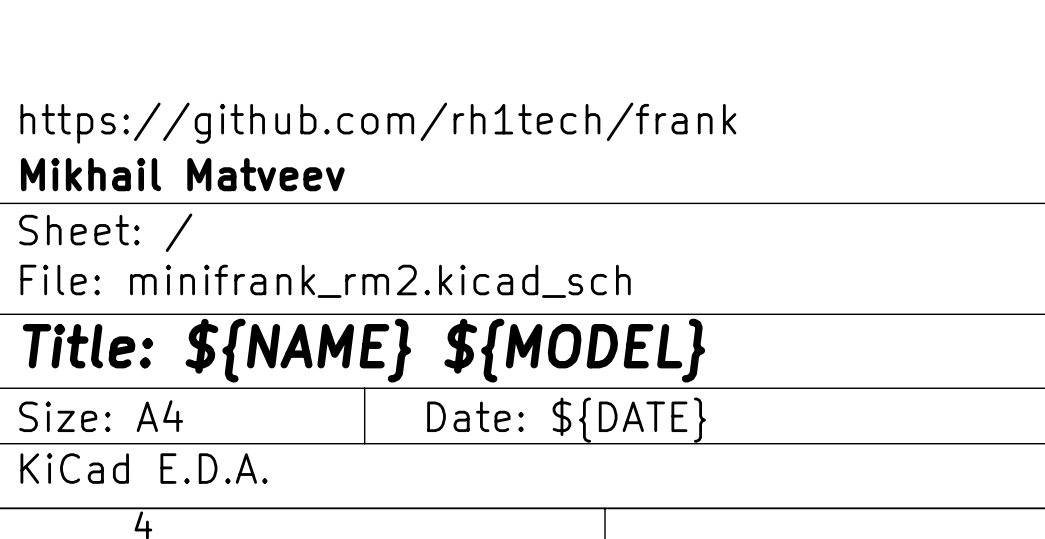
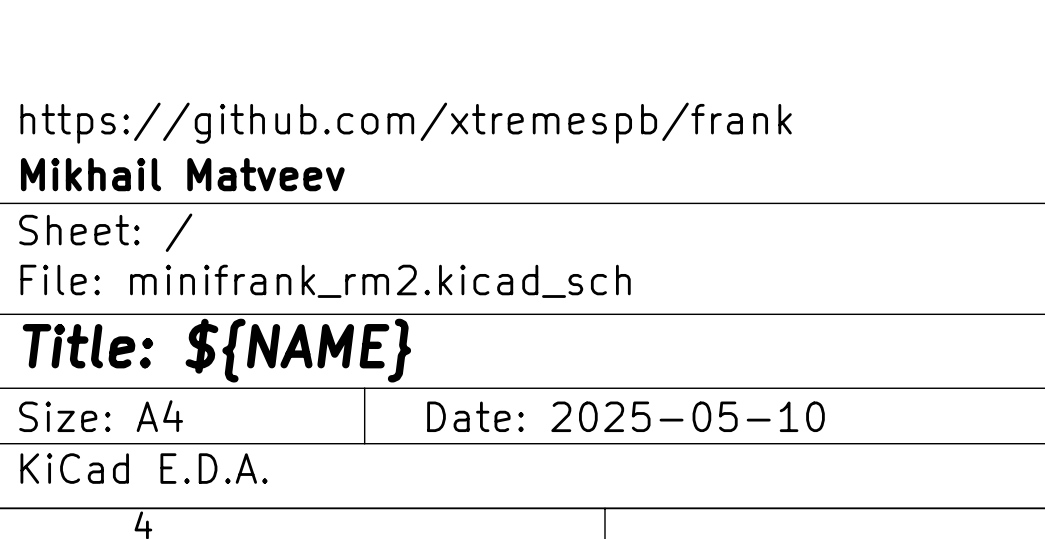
title block: https://github.com/rh1tech/frank (378, 123) -> https://github.com/xtremespb/frank (406, 123)
title block: Title: ${NAME} ${MODEL} (363, 350) -> Title: ${NAME} (216, 350)
title block: Date: ${DATE} (566, 420) -> Date: 2025-05-10 (625, 416)

